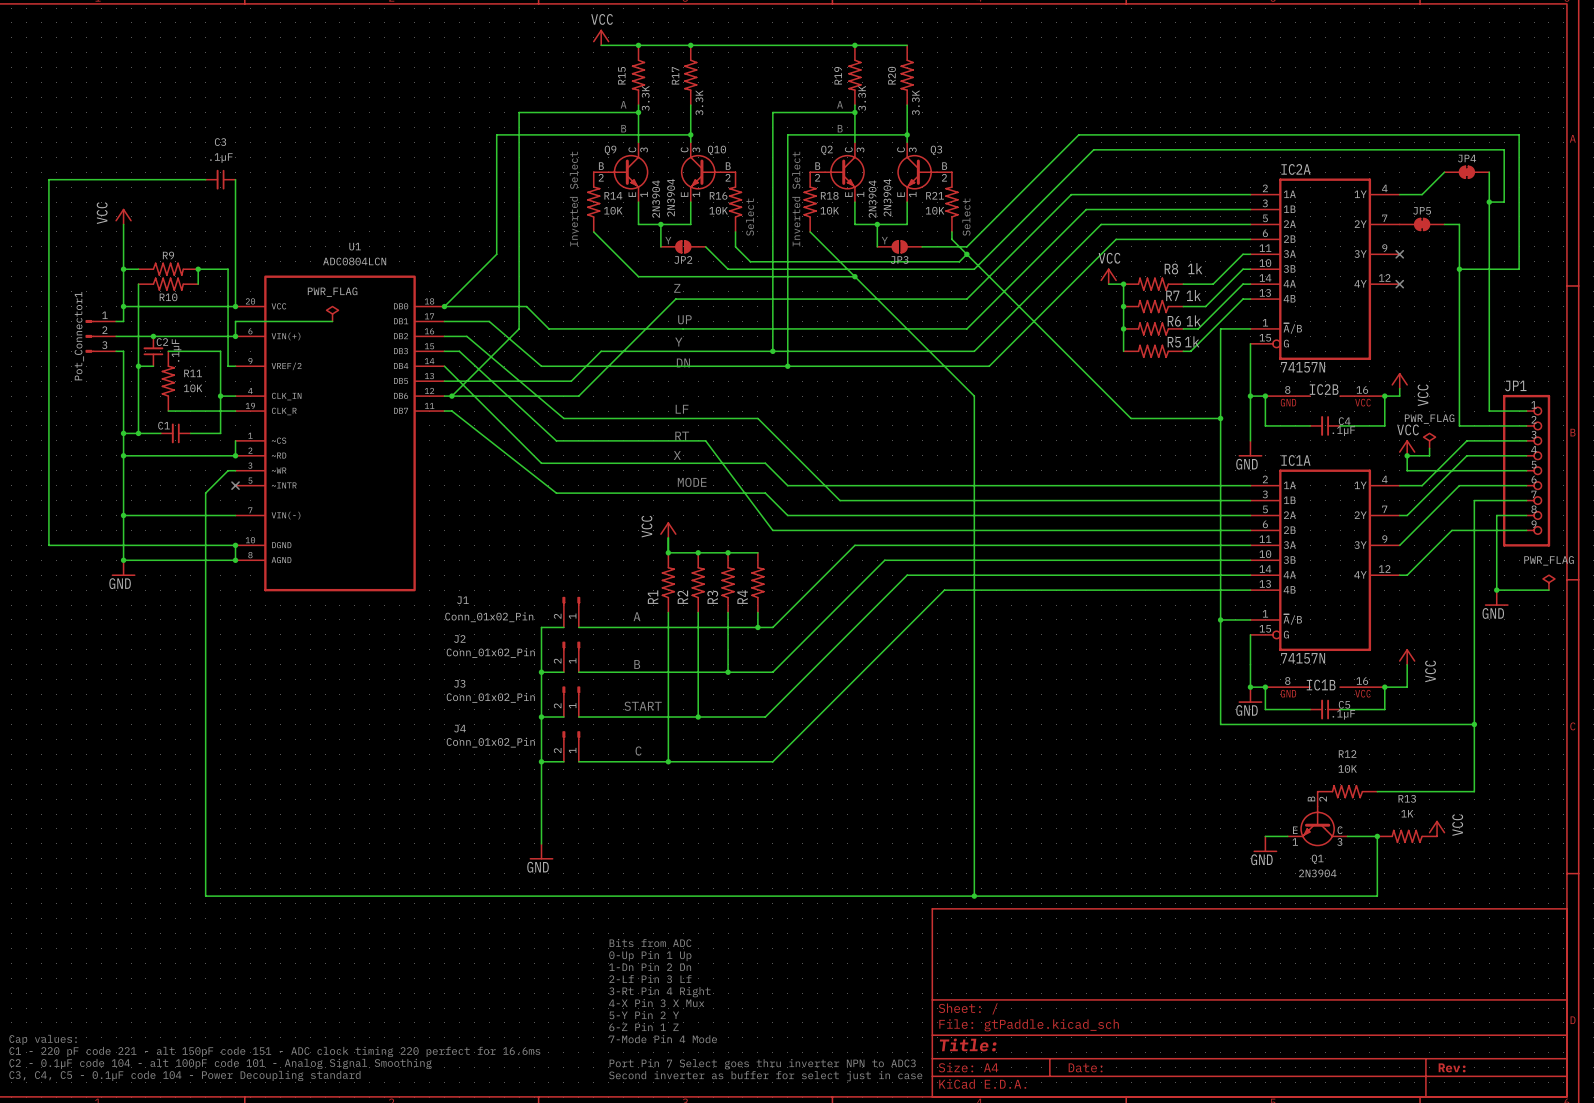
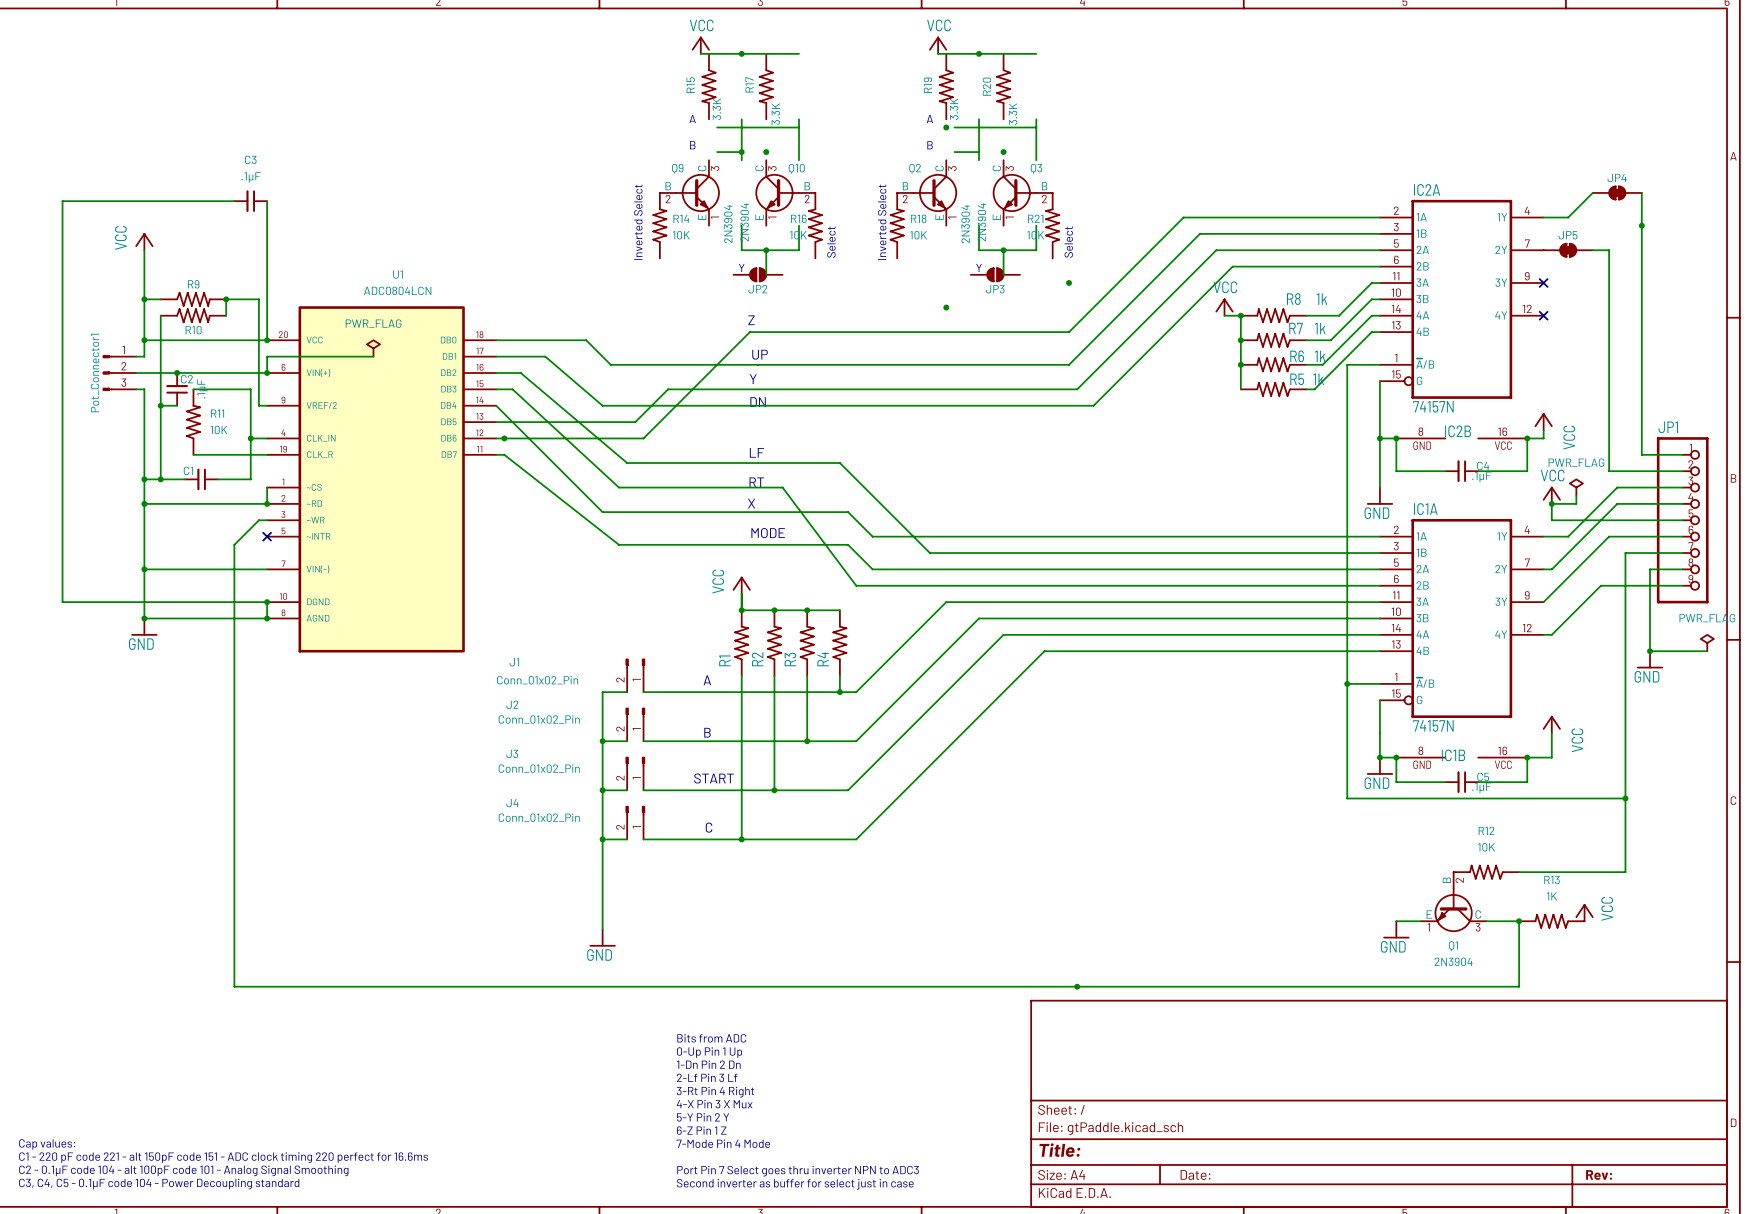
power symbol position: VCC (601, 37) -> VCC (700, 45)
power symbol: none -> VCC (938, 45)
wire: (601, 45) (631, 45) -> none
junction: (638, 45) -> none
junction: none -> (741, 53)
junction: (690, 45) -> none
wire: (720, 45) (847, 45) -> none
junction position: (854, 45) -> (979, 53)
wire: none -> (1003, 53) (1036, 53)
wire: (638, 105) (638, 142) -> (799, 119) (799, 160)
wire: (690, 105) (690, 142) -> (741, 119) (741, 160)
wire: (854, 105) (854, 142) -> (1036, 119) (1036, 160)
wire: (907, 105) (907, 142) -> (979, 119) (979, 160)
wire: (638, 112) (519, 112) (519, 328) (451, 396) -> none
junction: (638, 112) -> none
wire: none -> (717, 127) (799, 127)
wire: (854, 112) (772, 112) (772, 351) -> none
wire: none -> (954, 127) (1036, 127)
wire: (645, 134) (496, 134) (496, 254) (444, 306) -> none
wire: (668, 134) (690, 134) -> none
junction: none -> (741, 152)
wire: (862, 134) (787, 134) (787, 366) -> none
wire: (884, 134) (907, 134) -> none
wire: (638, 202) (638, 224) (668, 224) -> (741, 225) (741, 250)
wire: (690, 202) (690, 224) -> none
wire: none -> (799, 225) (799, 250) (766, 250) (766, 274)
wire: (854, 202) (854, 224) (884, 224) -> (979, 225) (979, 250)
wire: (907, 202) (907, 224) -> none
wire: none -> (1036, 225) (1036, 250) (1003, 250) (1003, 274)
wire: (1489, 202) (1504, 202) (1504, 149) (1093, 149) (974, 269) (728, 269) (705, 246) -> none
wire: (660, 224) (660, 246) -> none
junction position: (660, 224) -> (766, 250)
wire: (877, 224) (877, 246) -> none
junction position: (877, 224) -> (1003, 250)
wire: (593, 231) (638, 276) (854, 276) -> none
wire: (735, 231) (735, 246) (750, 261) (959, 261) (966, 254) -> none
wire: (810, 231) (974, 396) (974, 896) -> none
wire: (951, 231) (951, 239) (1131, 418) (1220, 418) -> none
wire: (922, 246) (966, 246) (1078, 134) (1519, 134) (1519, 269) (1459, 269) -> none
junction: (1459, 269) -> none
junction: (444, 306) -> none
junction: (772, 351) -> none
junction: (787, 366) -> none
junction: (1220, 418) -> none

